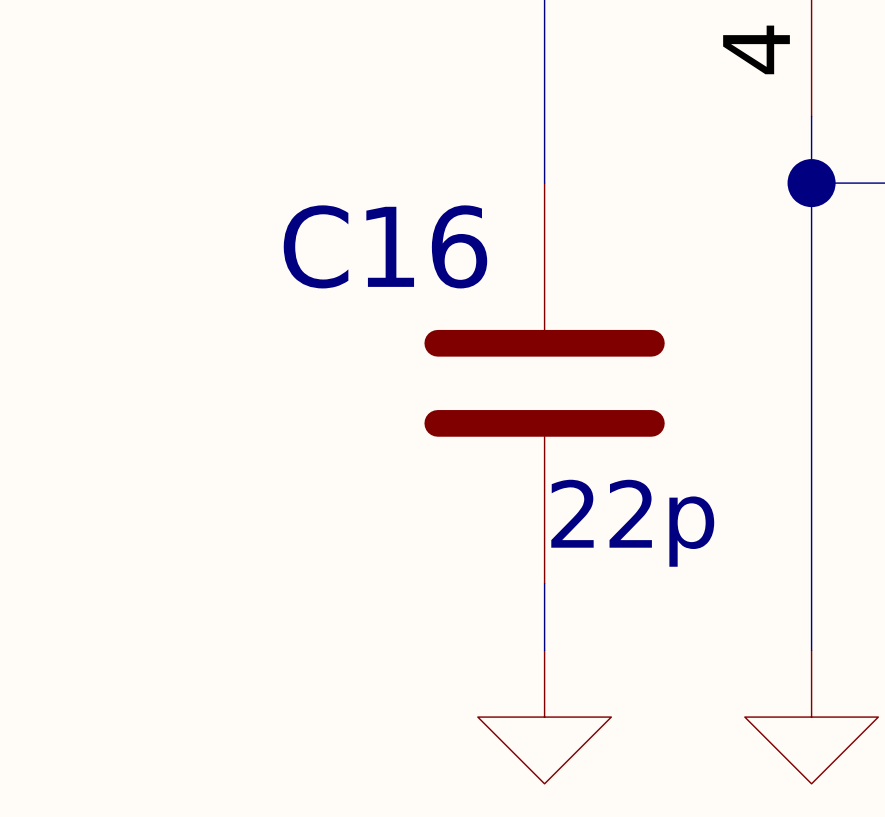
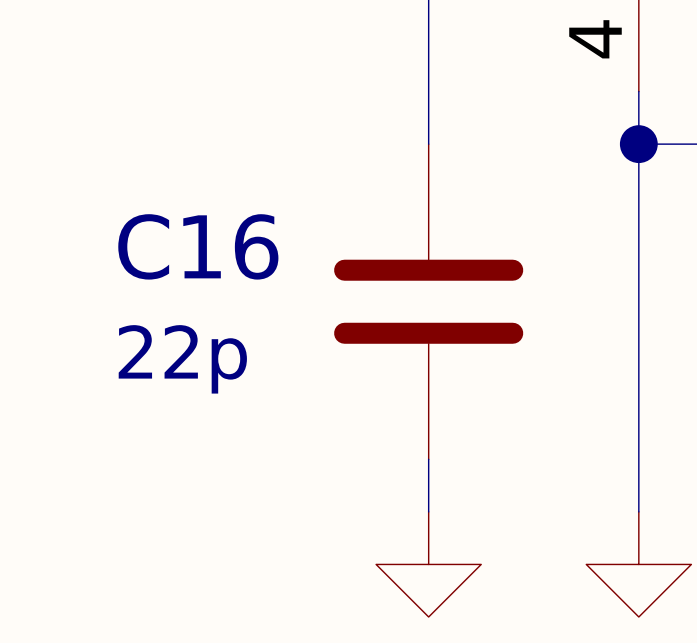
C16 name position: C16 (385, 246) -> C16 (198, 246)
C16 text position: 22p (632, 523) -> 22p (182, 359)

